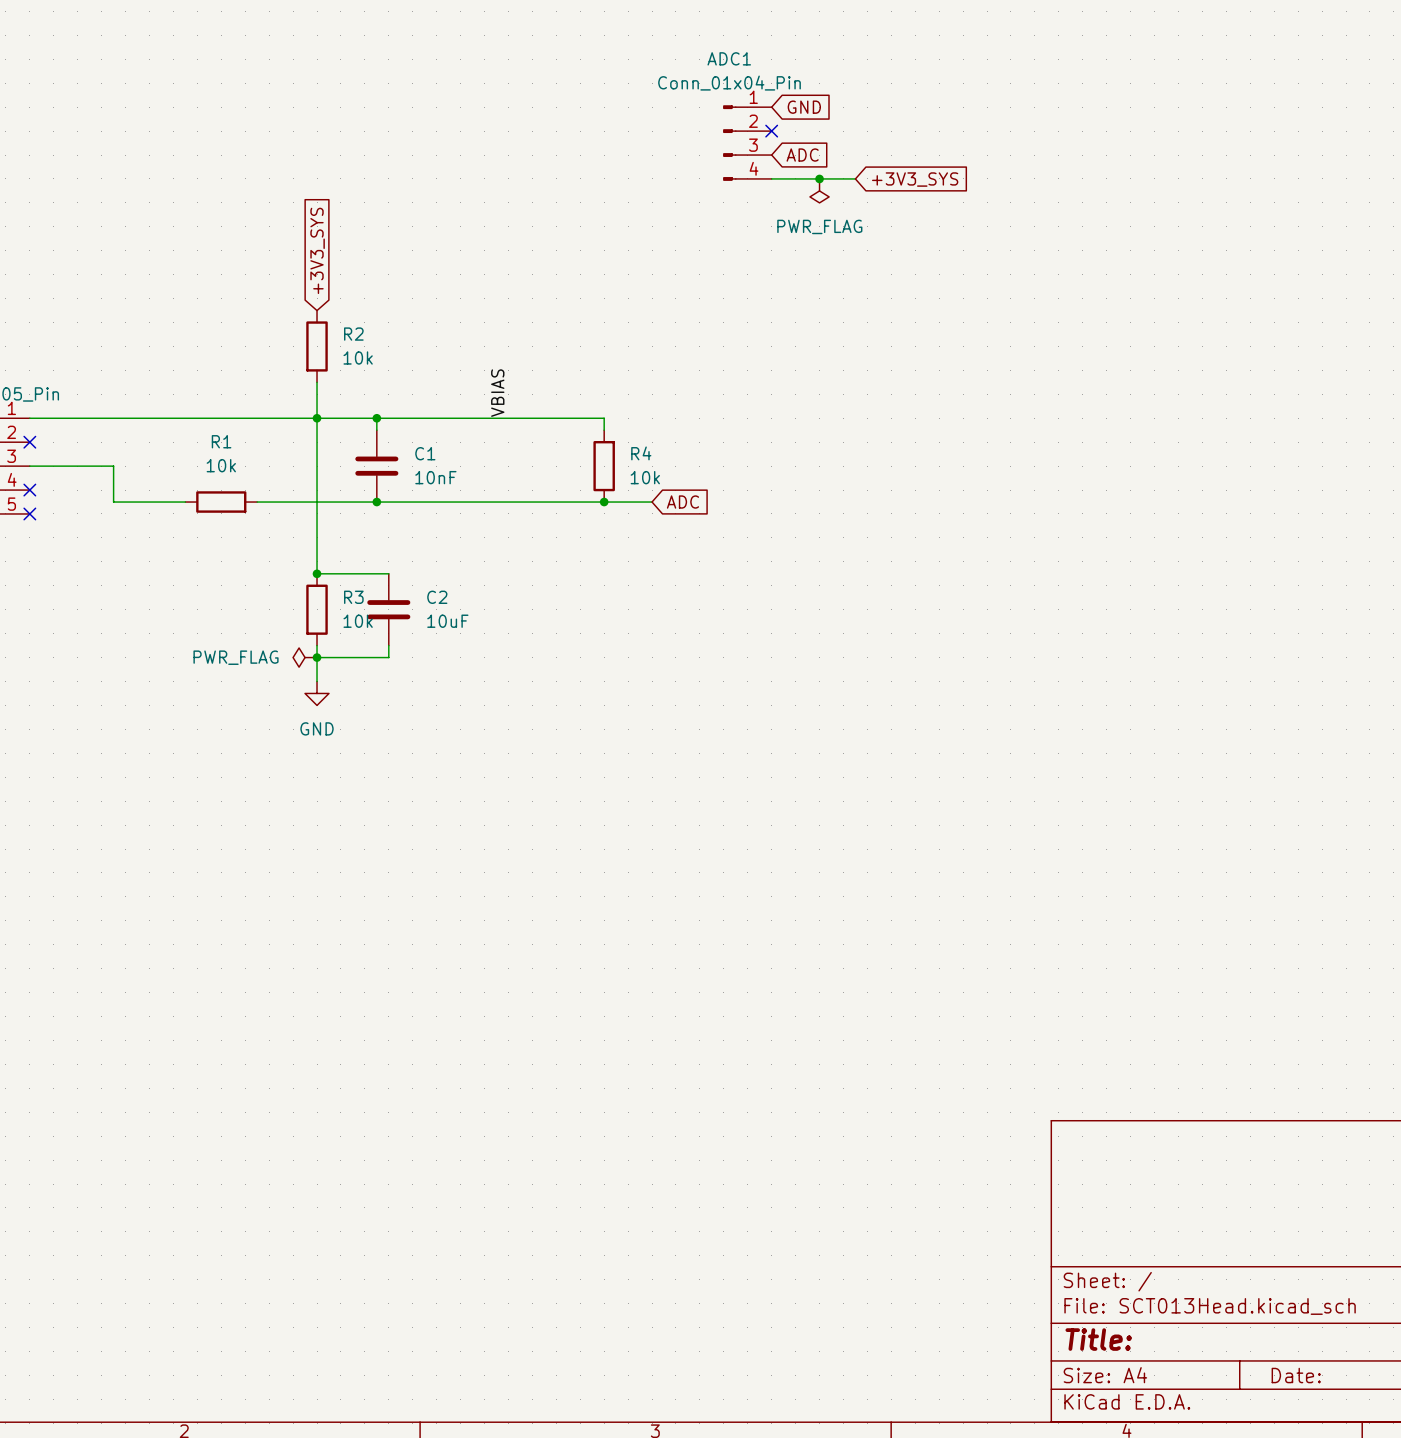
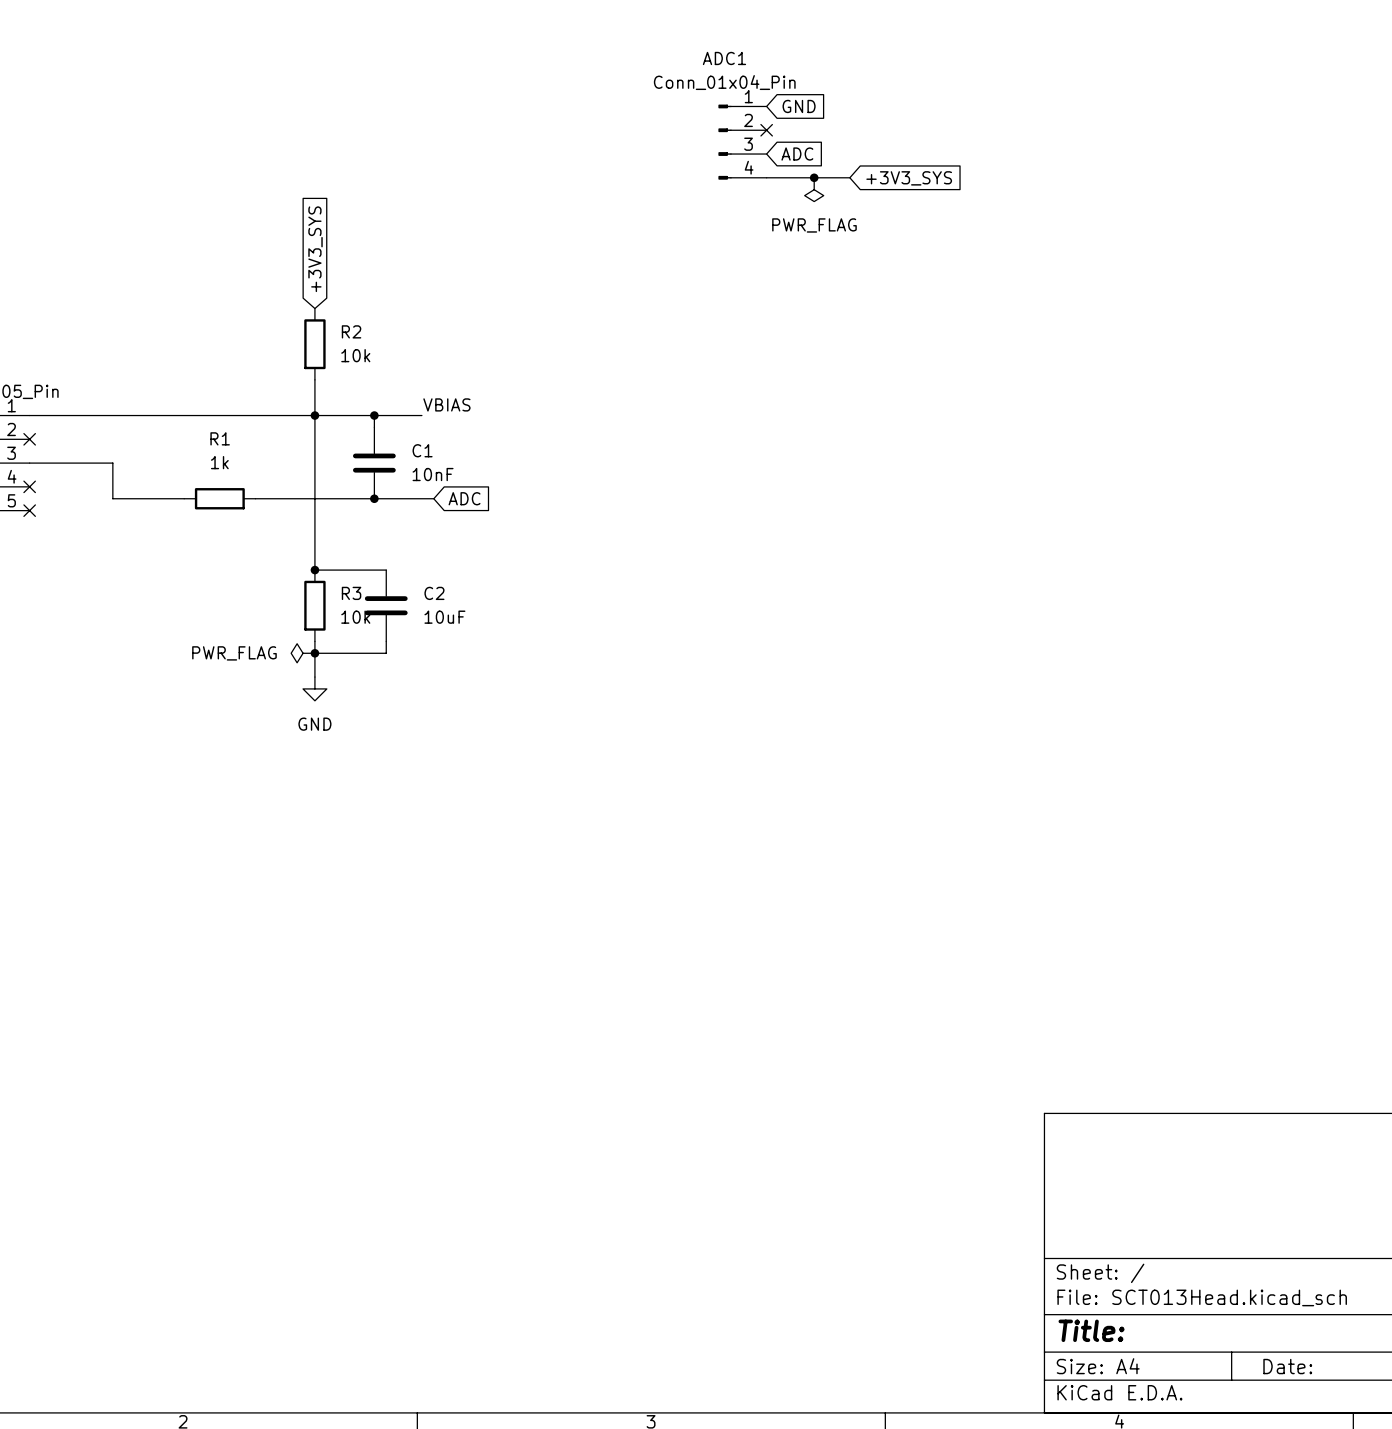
label rotation: 0° (497, 393) -> 90° clockwise (446, 404)
wire: (424, 418) (604, 418) (604, 430) -> none
R1 value: 10k (221, 465) -> 1k (219, 462)
R4: 10k (604, 466) -> none
wire: (436, 502) (652, 502) -> none
junction: (604, 502) -> none
global label position: ADC (682, 502) -> ADC (464, 498)

